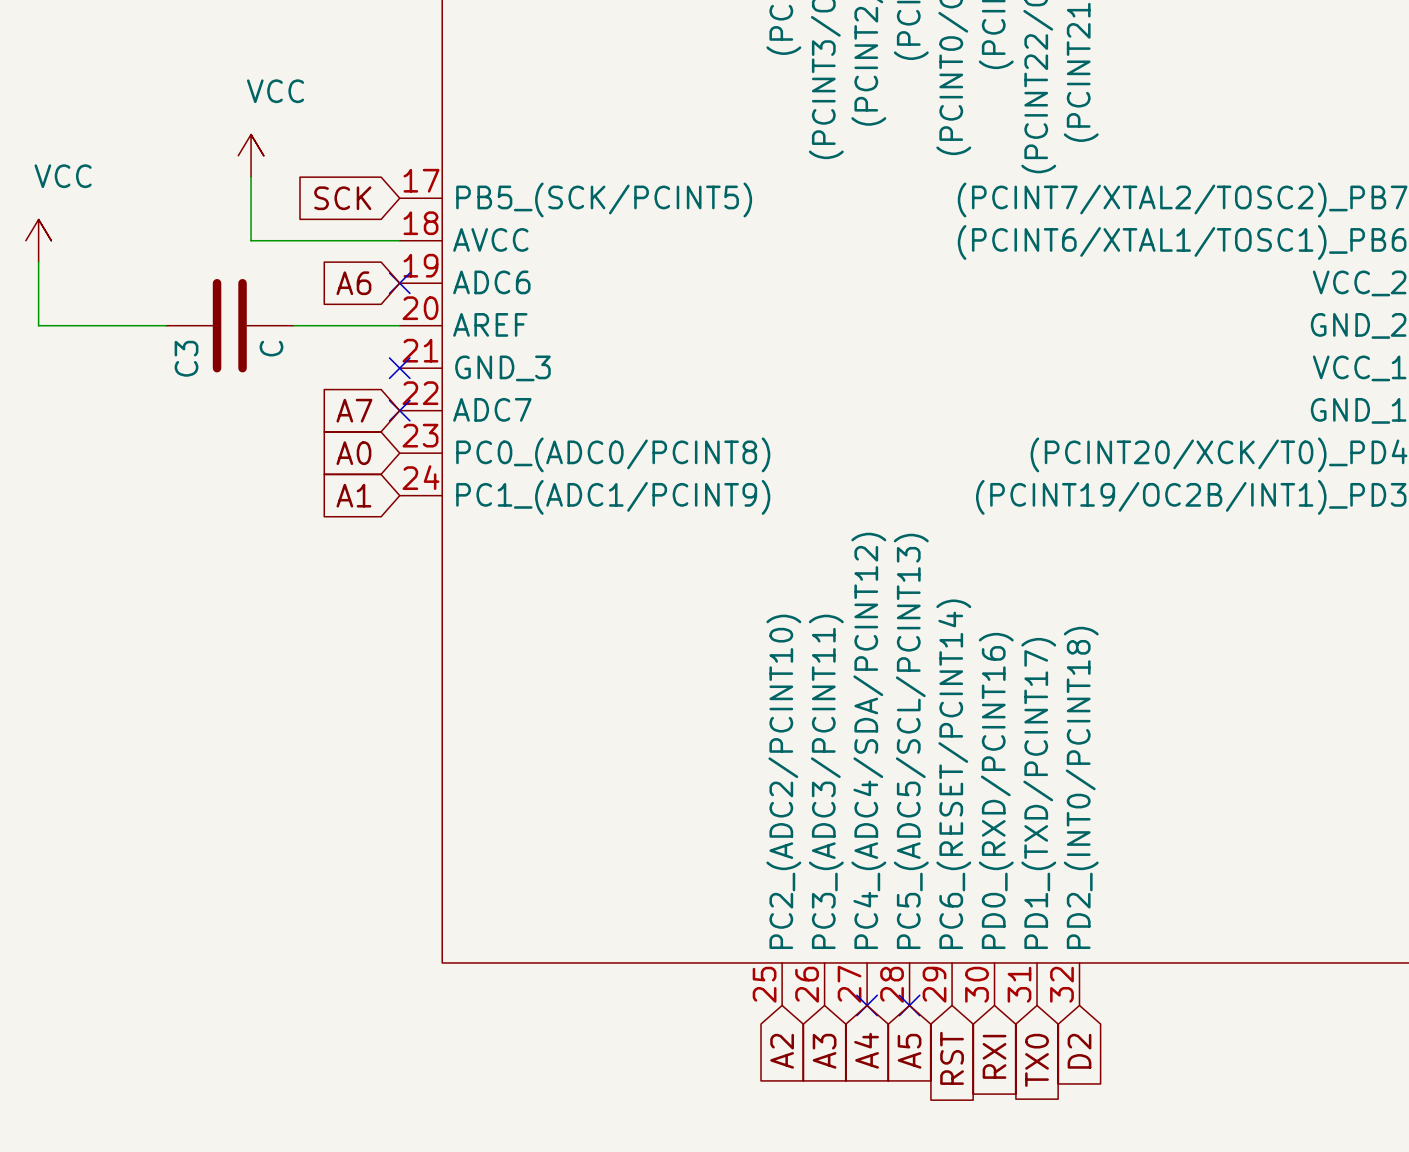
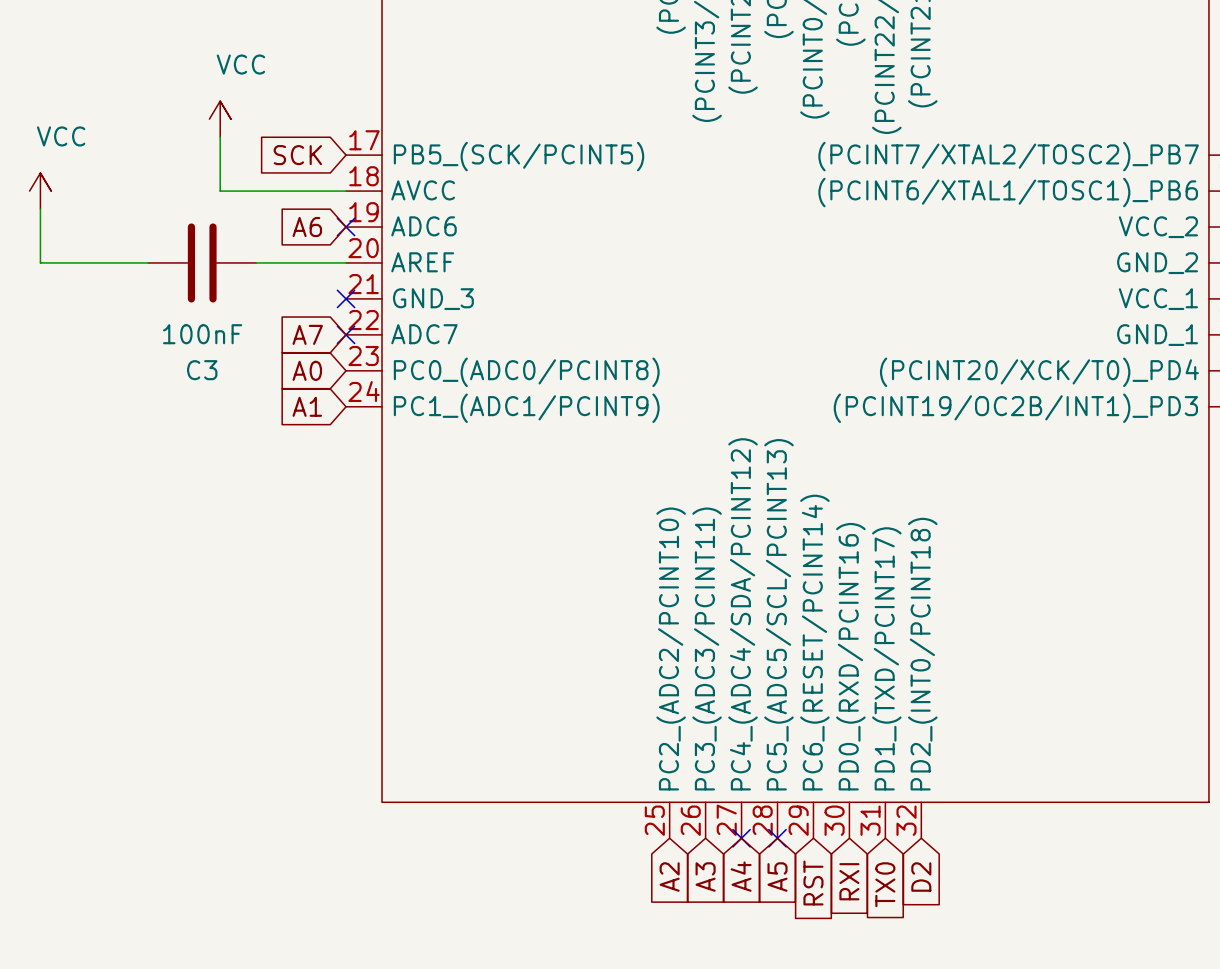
C3 value: C (271, 348) -> 100nF (202, 334)
C3 name rotation: 0° (186, 358) -> 90° clockwise (202, 370)
C3 name position: C3 (186, 358) -> C3 (202, 370)

